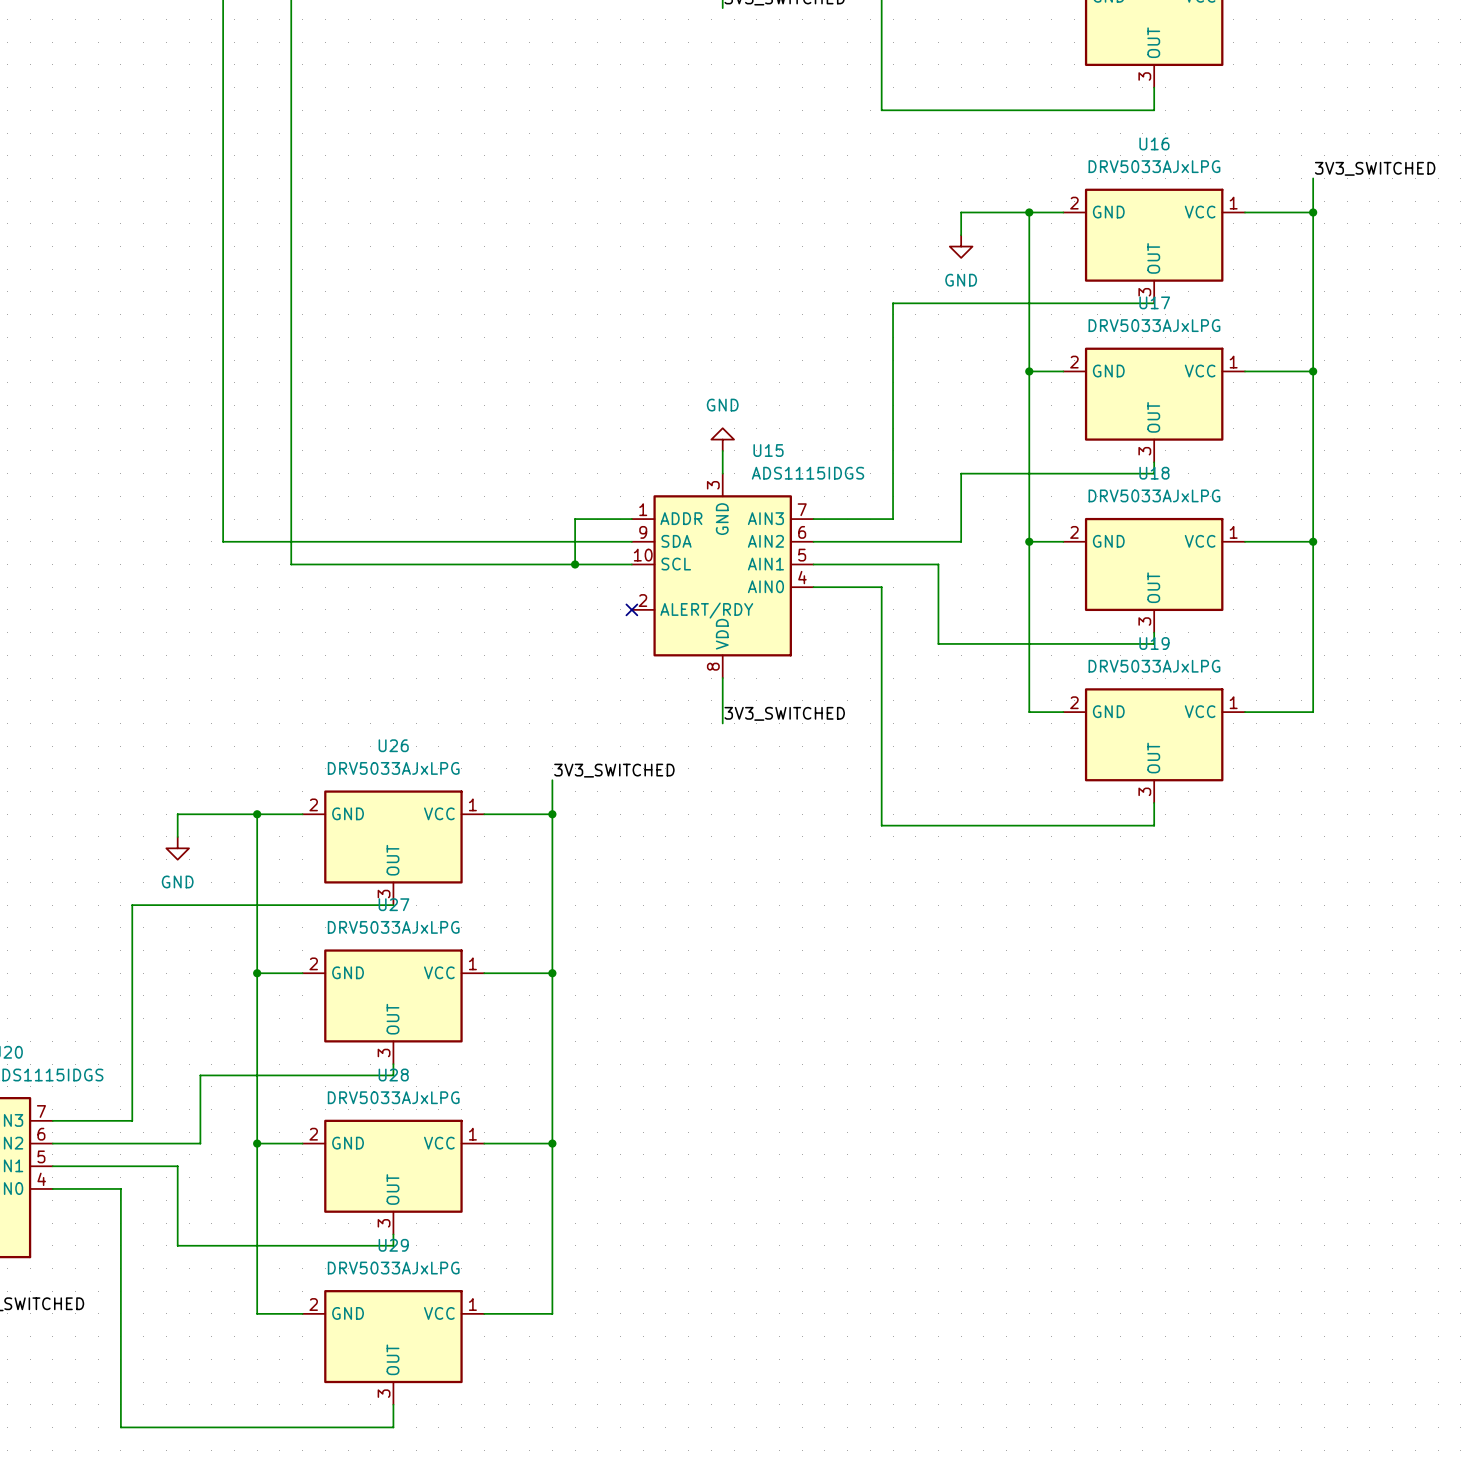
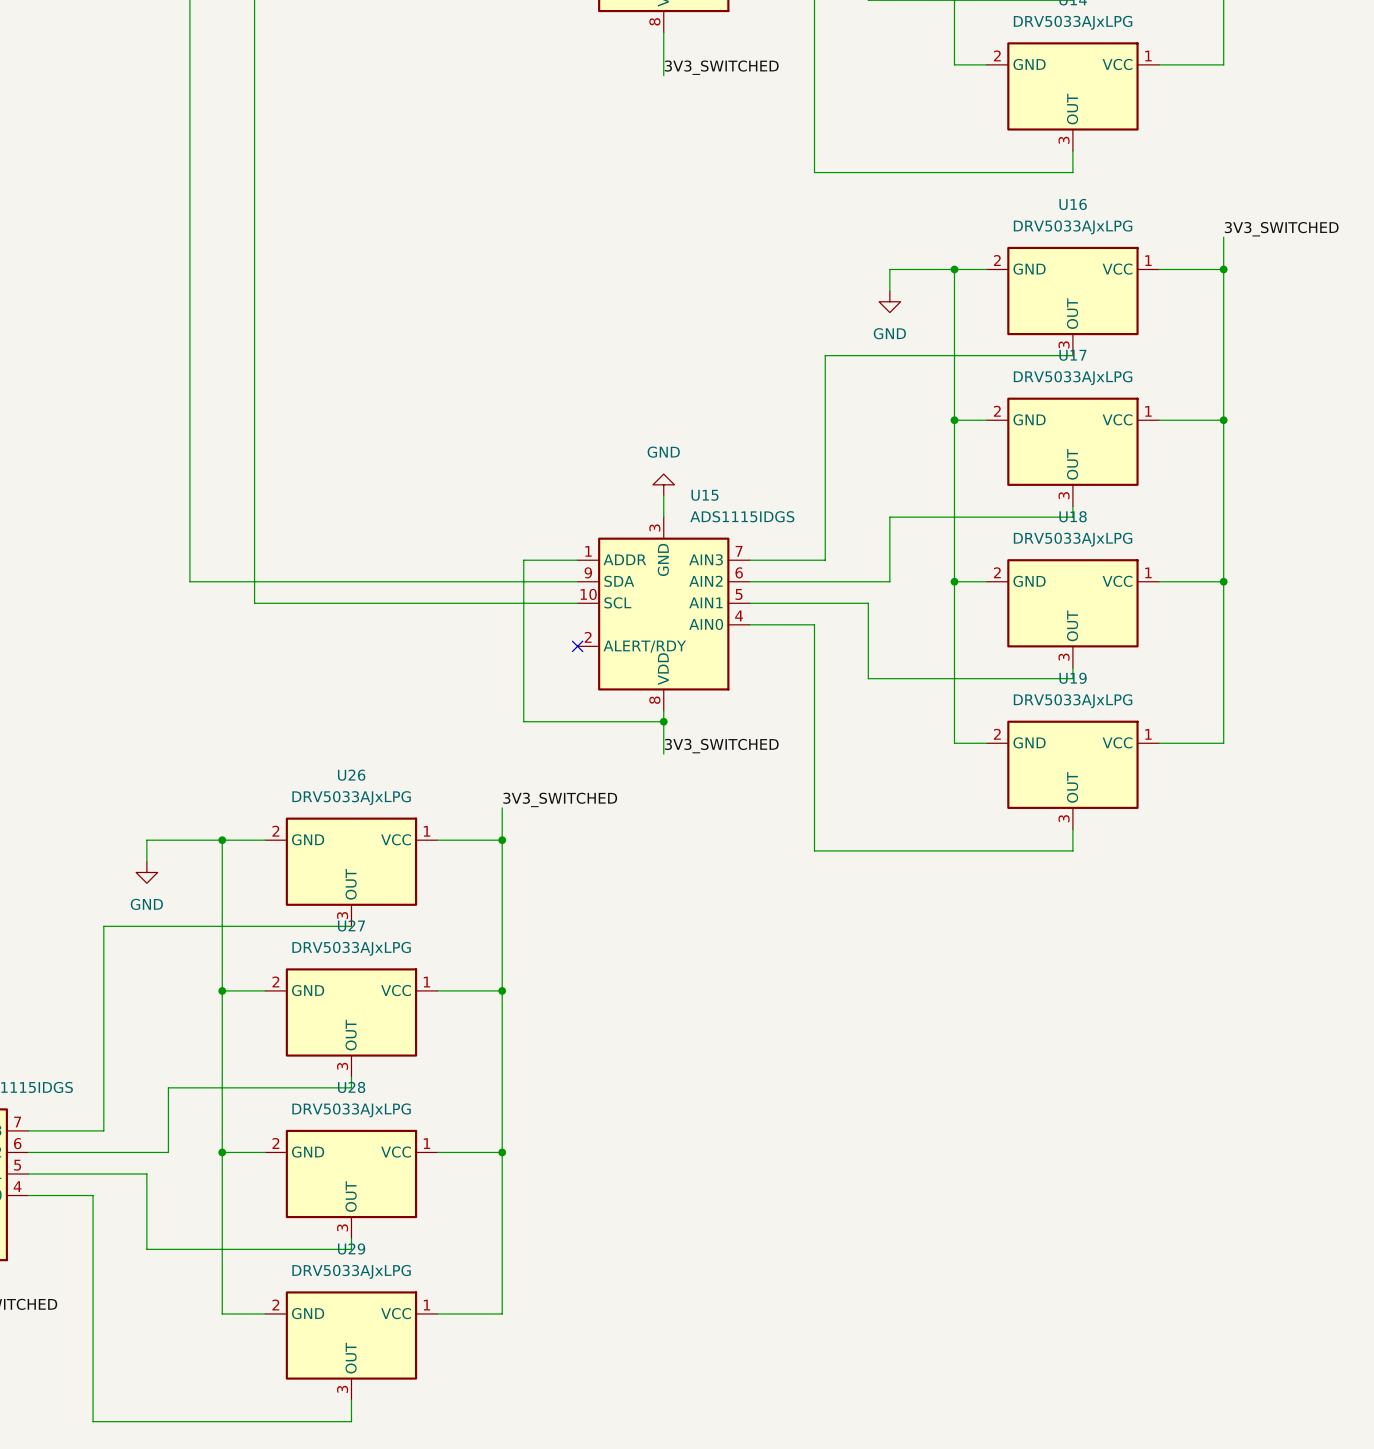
wire: none -> (523, 603) (523, 721) (663, 721)
junction: (575, 564) -> none
junction: none -> (663, 721)

